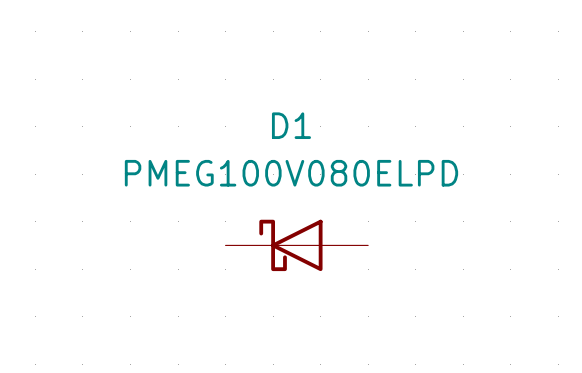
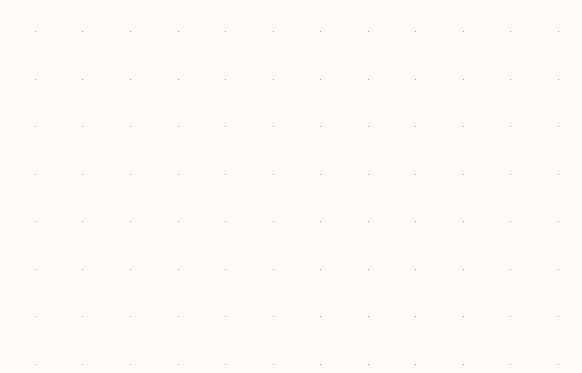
D1: PMEG100V080ELPD (296, 245) -> none

